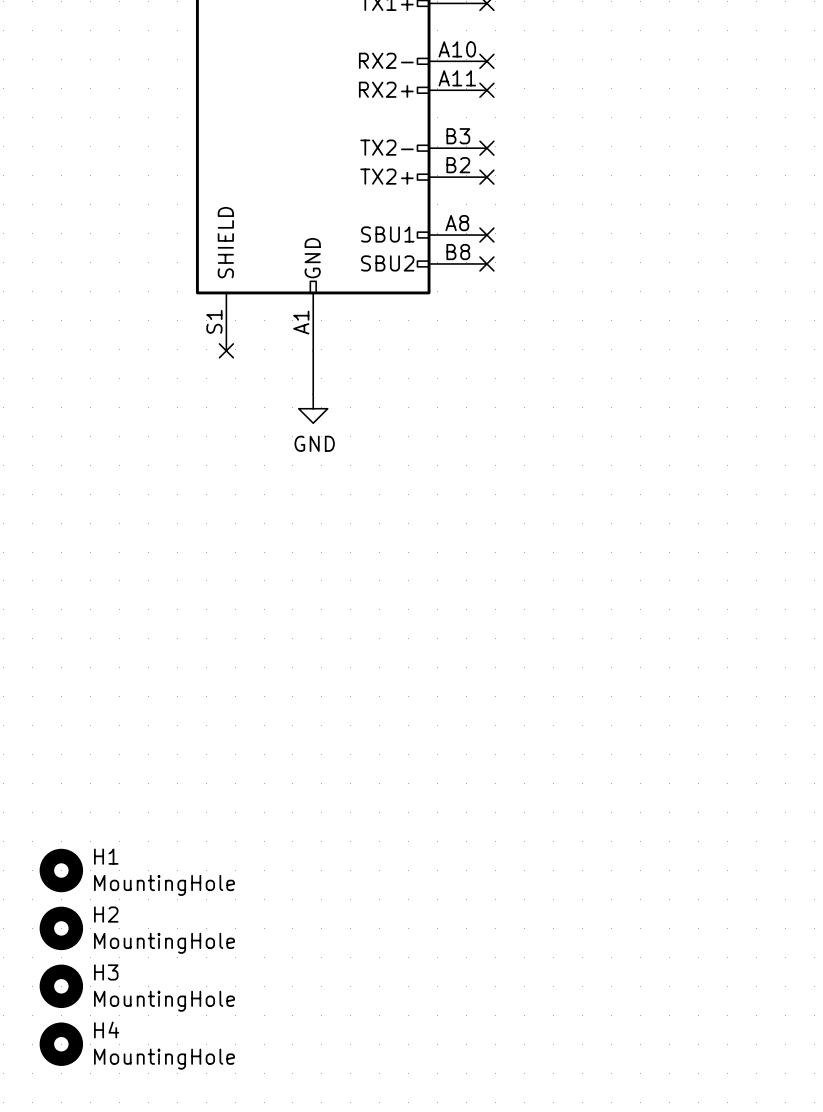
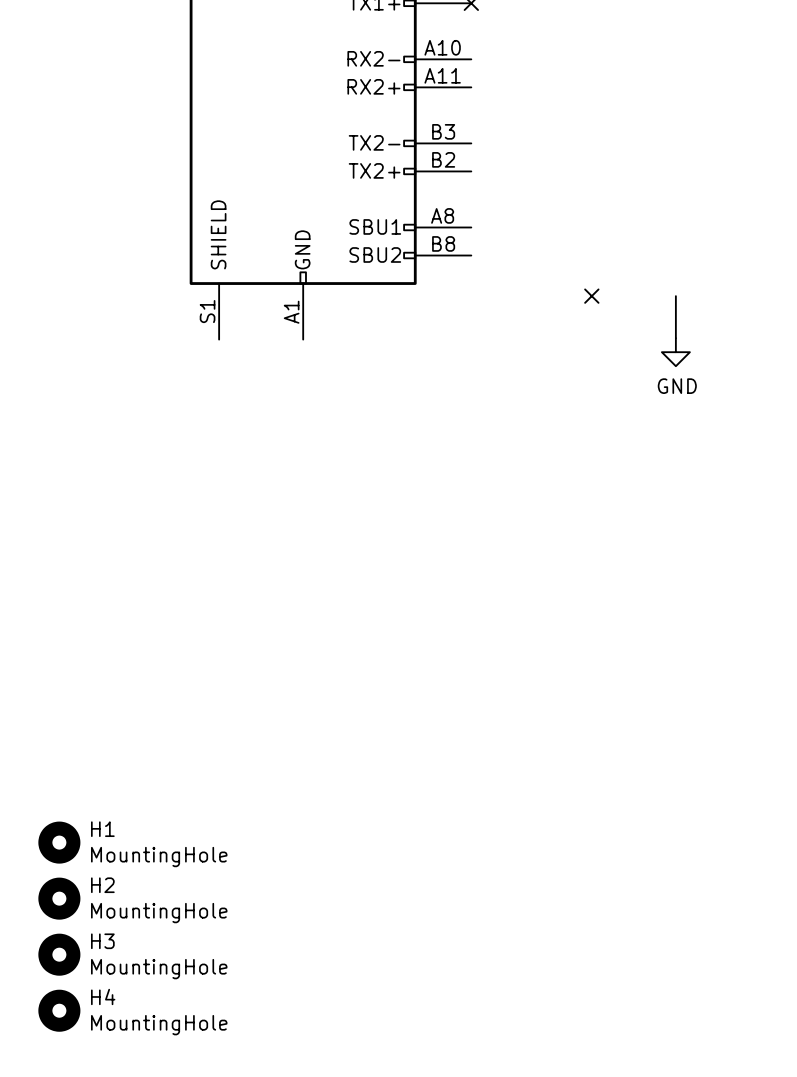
no-connect mark: (486, 61) -> none
no-connect mark: (486, 90) -> none
no-connect mark: (486, 148) -> none
no-connect mark: (486, 177) -> none
no-connect mark: (486, 235) -> none
no-connect mark: (486, 263) -> none
no-connect mark: none -> (591, 296)
wire: none -> (675, 296) (675, 338)
no-connect mark: (226, 350) -> none
wire: (313, 350) (313, 394) -> none
power symbol: none -> GND (675, 352)
power symbol: GND (313, 408) -> none

